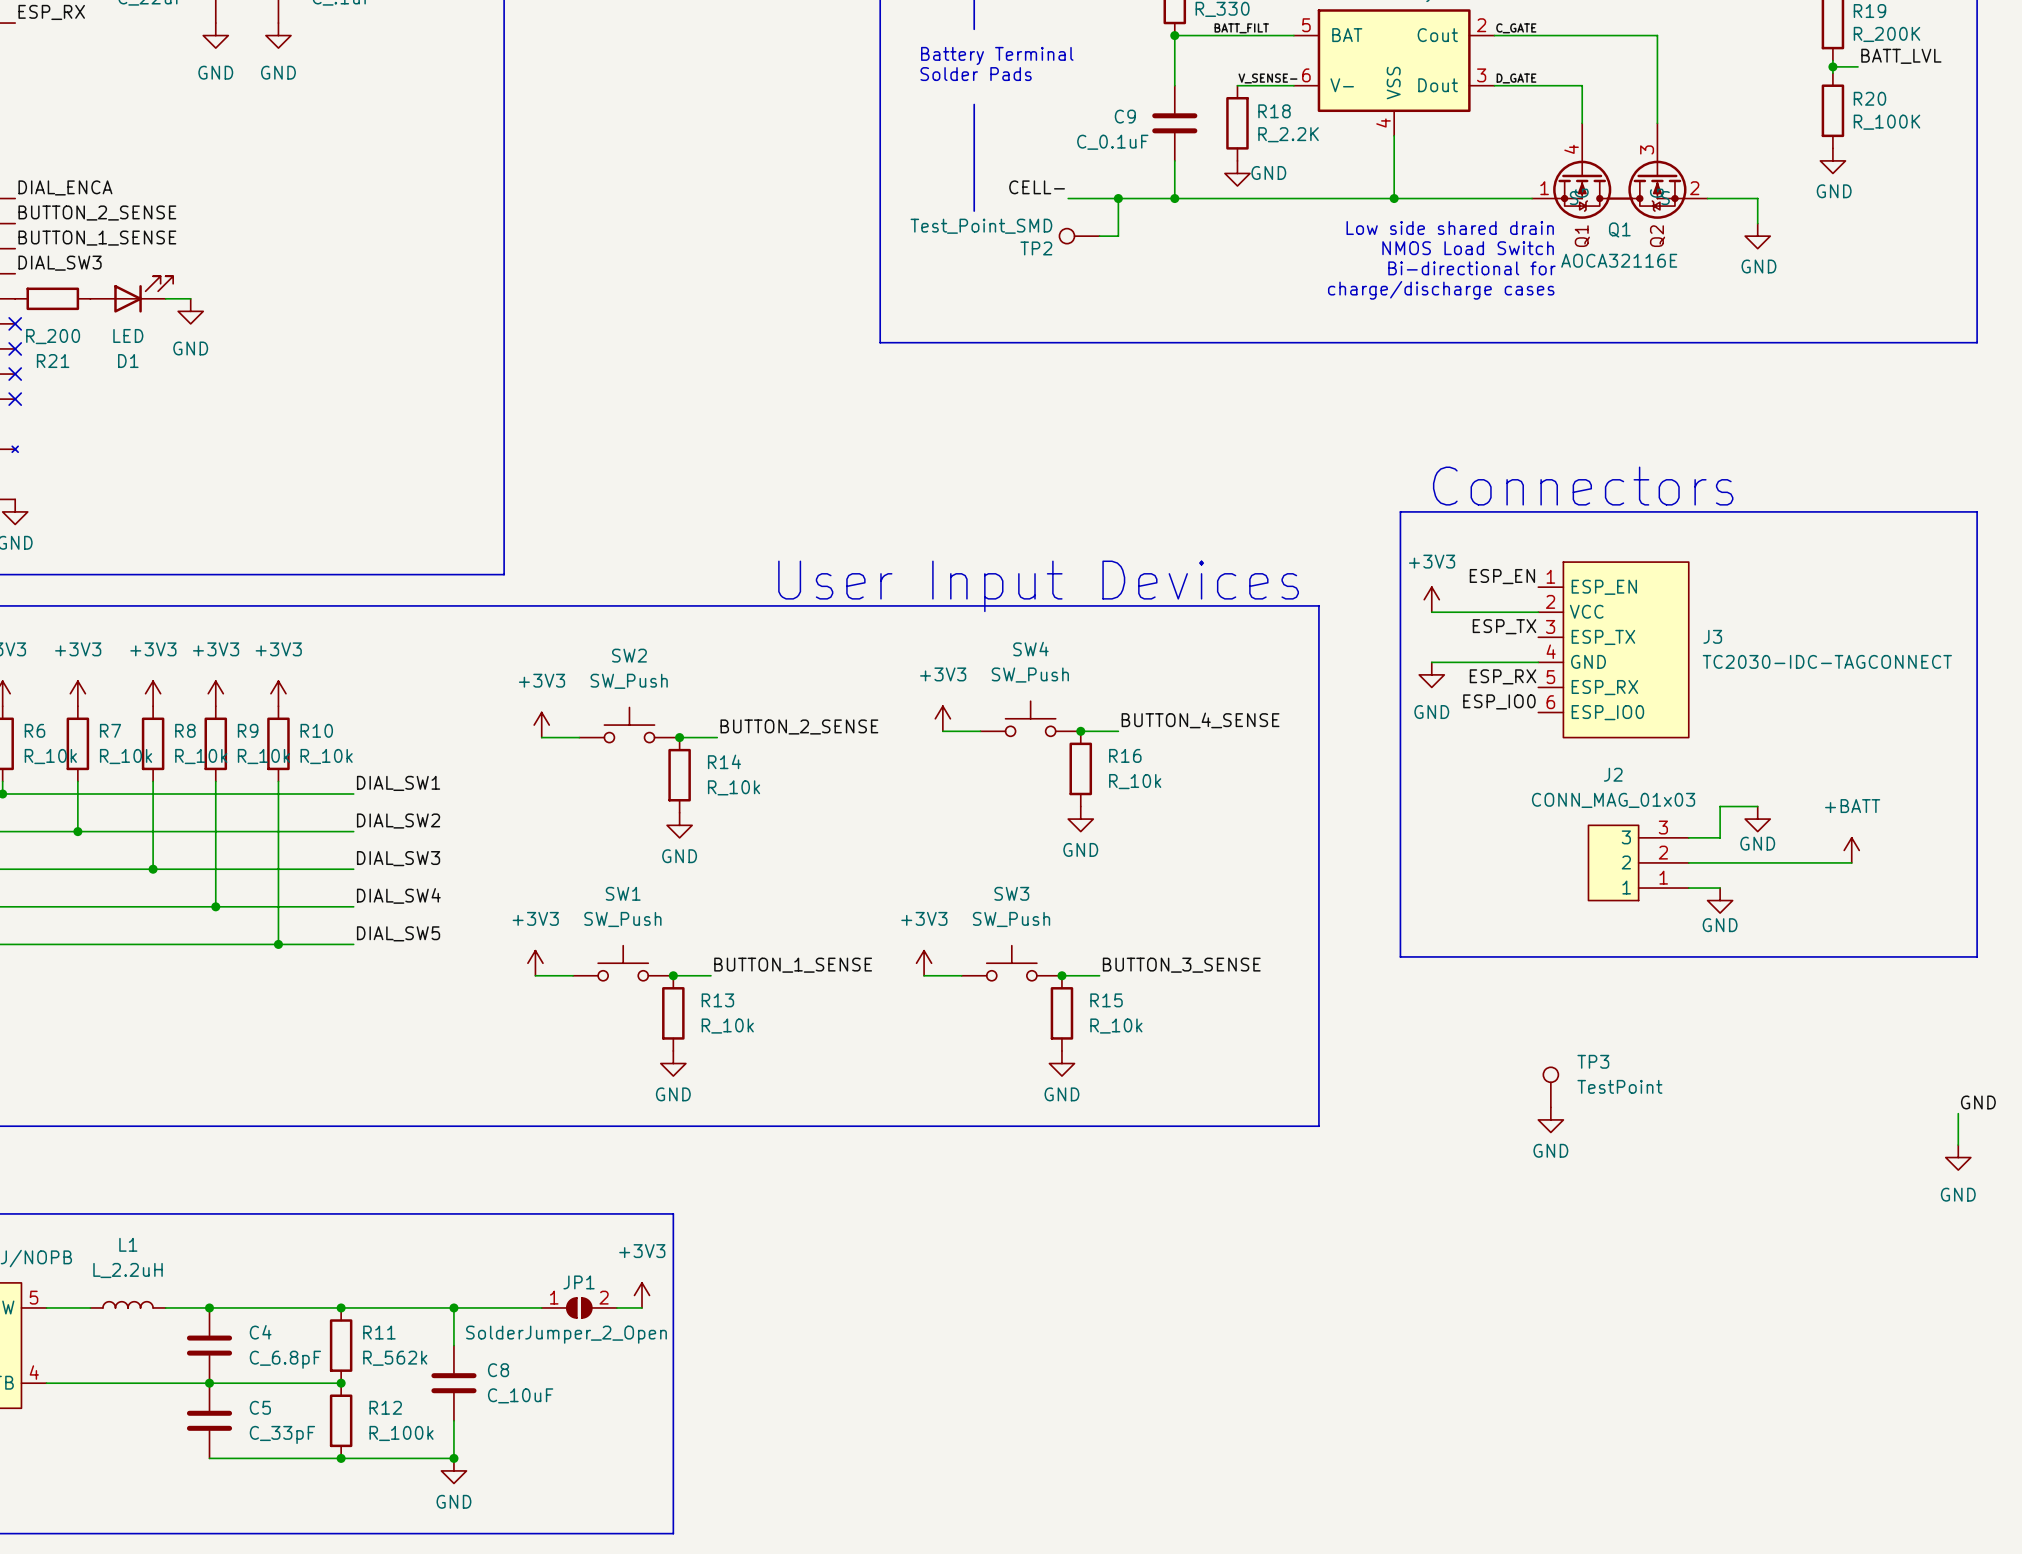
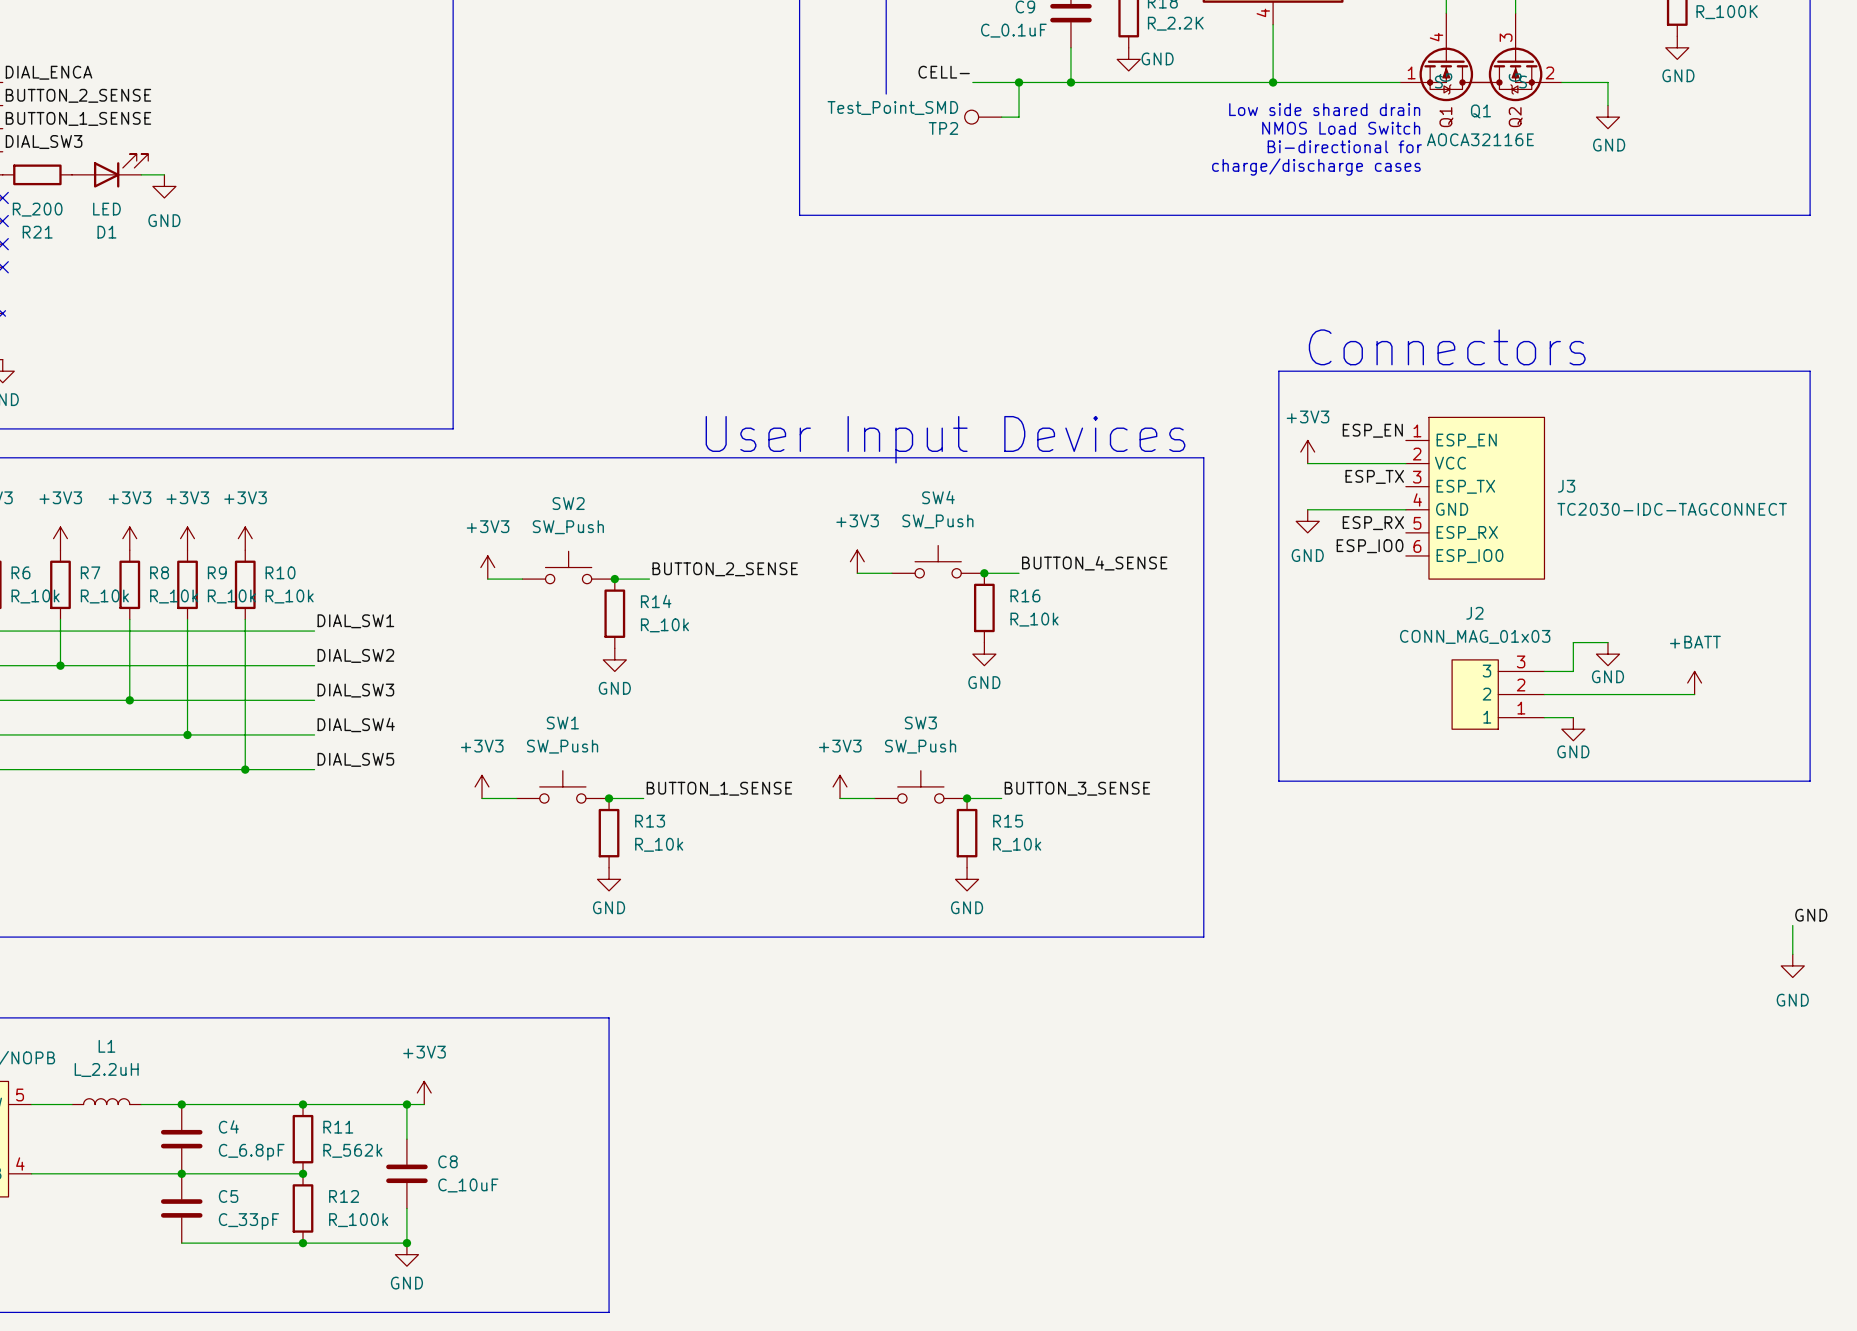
TP3: TestPoint (1550, 1087) -> none
power symbol: GND (1550, 1119) -> none
power symbol position: +3V3 (642, 1295) -> +3V3 (424, 1092)
wire: (472, 1307) (541, 1307) -> none
JP1: SolderJumper_2_Open (579, 1307) -> none
wire: (616, 1307) (642, 1307) -> none

